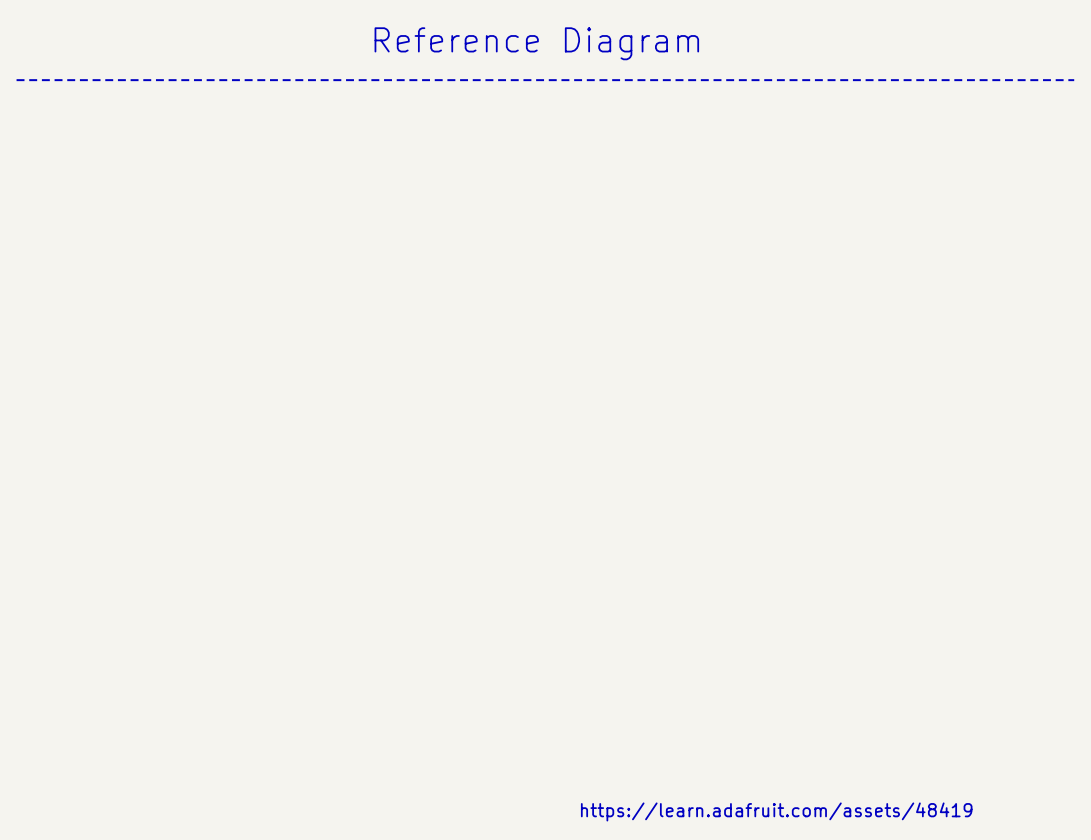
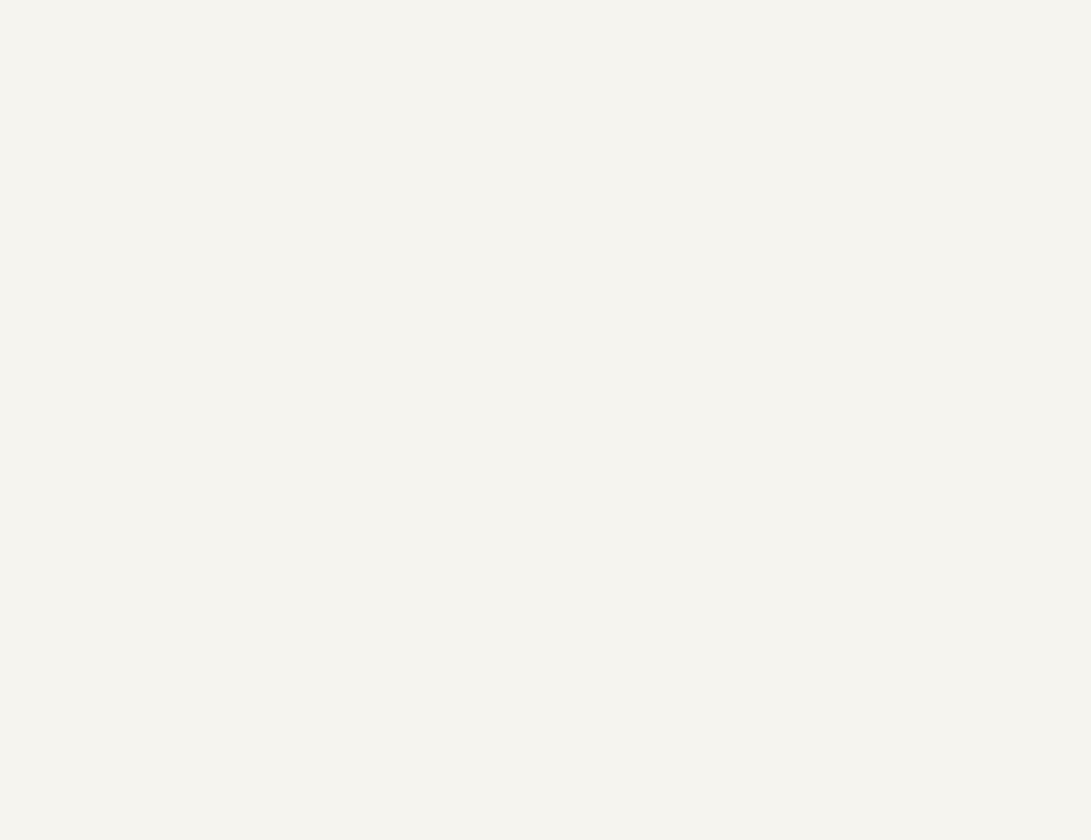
text: Reference Diagram (536, 43) -> none
line: (16, 80) (1074, 80) -> none
text: https://learn.adafruit.com/assets/48419 (776, 811) -> none

